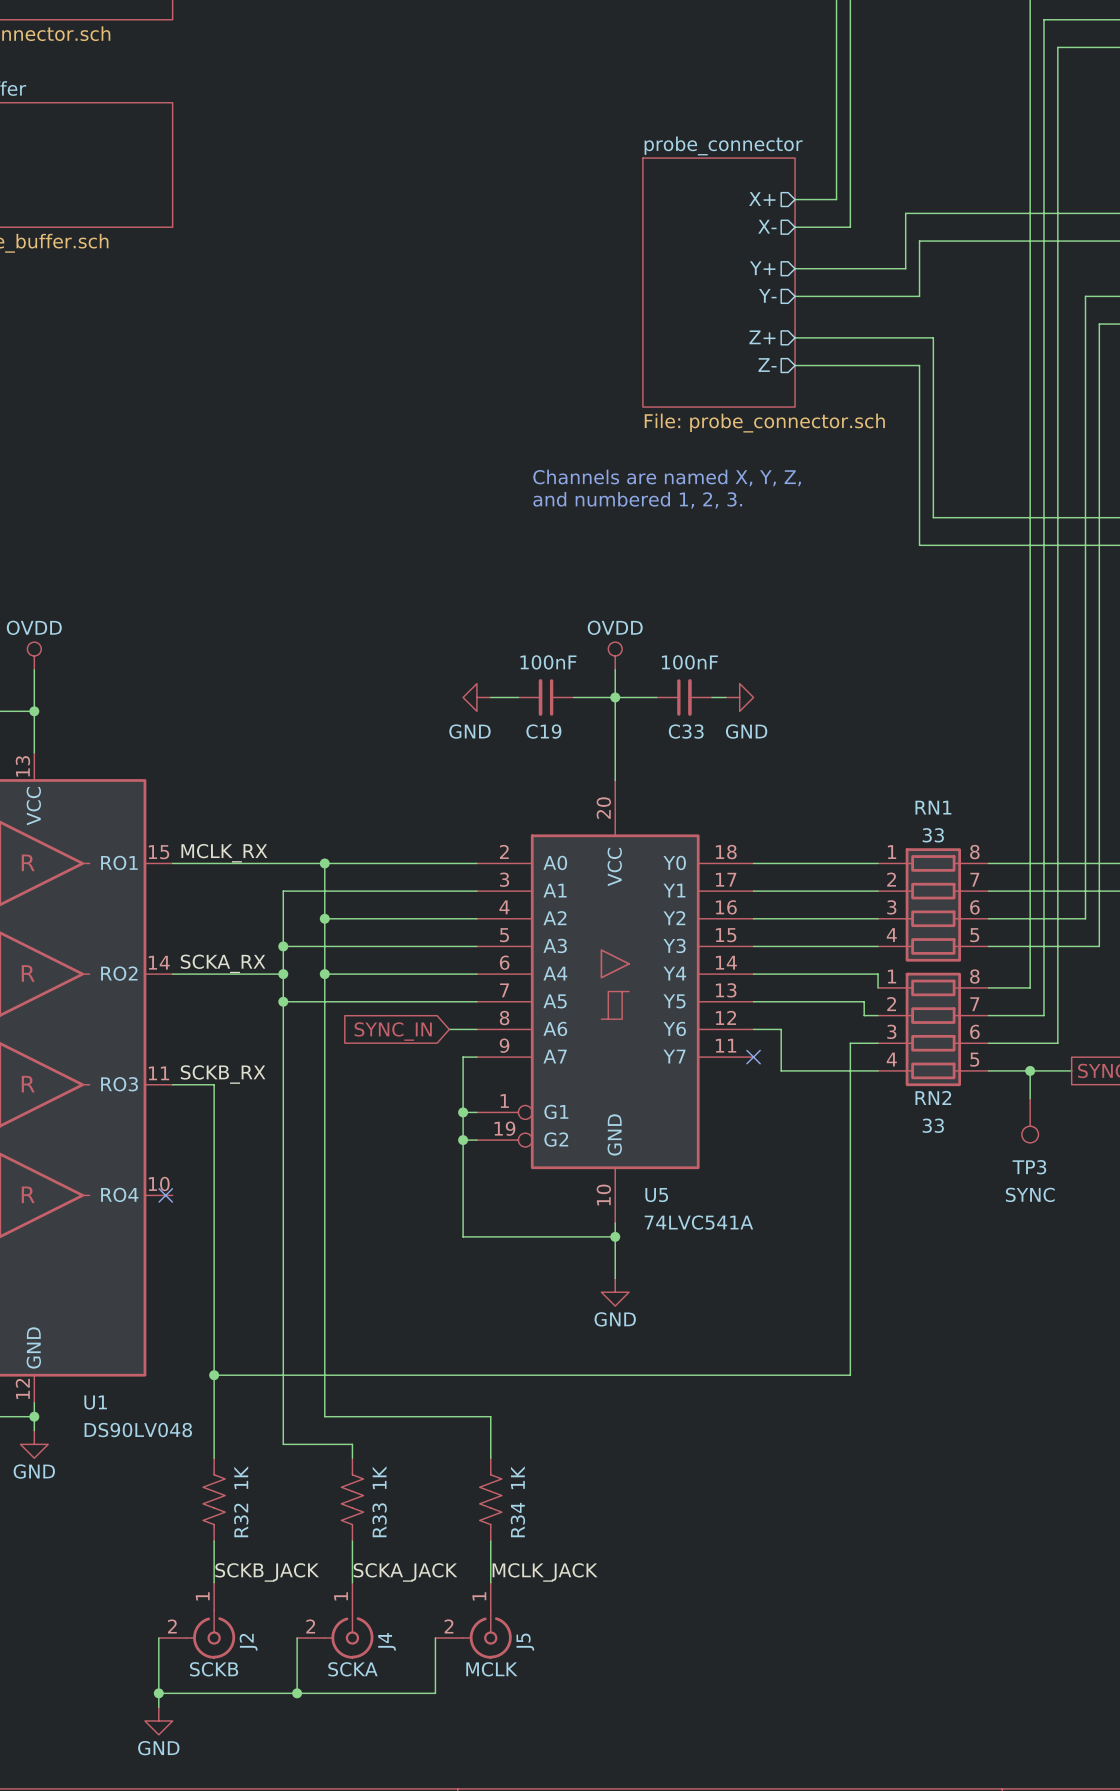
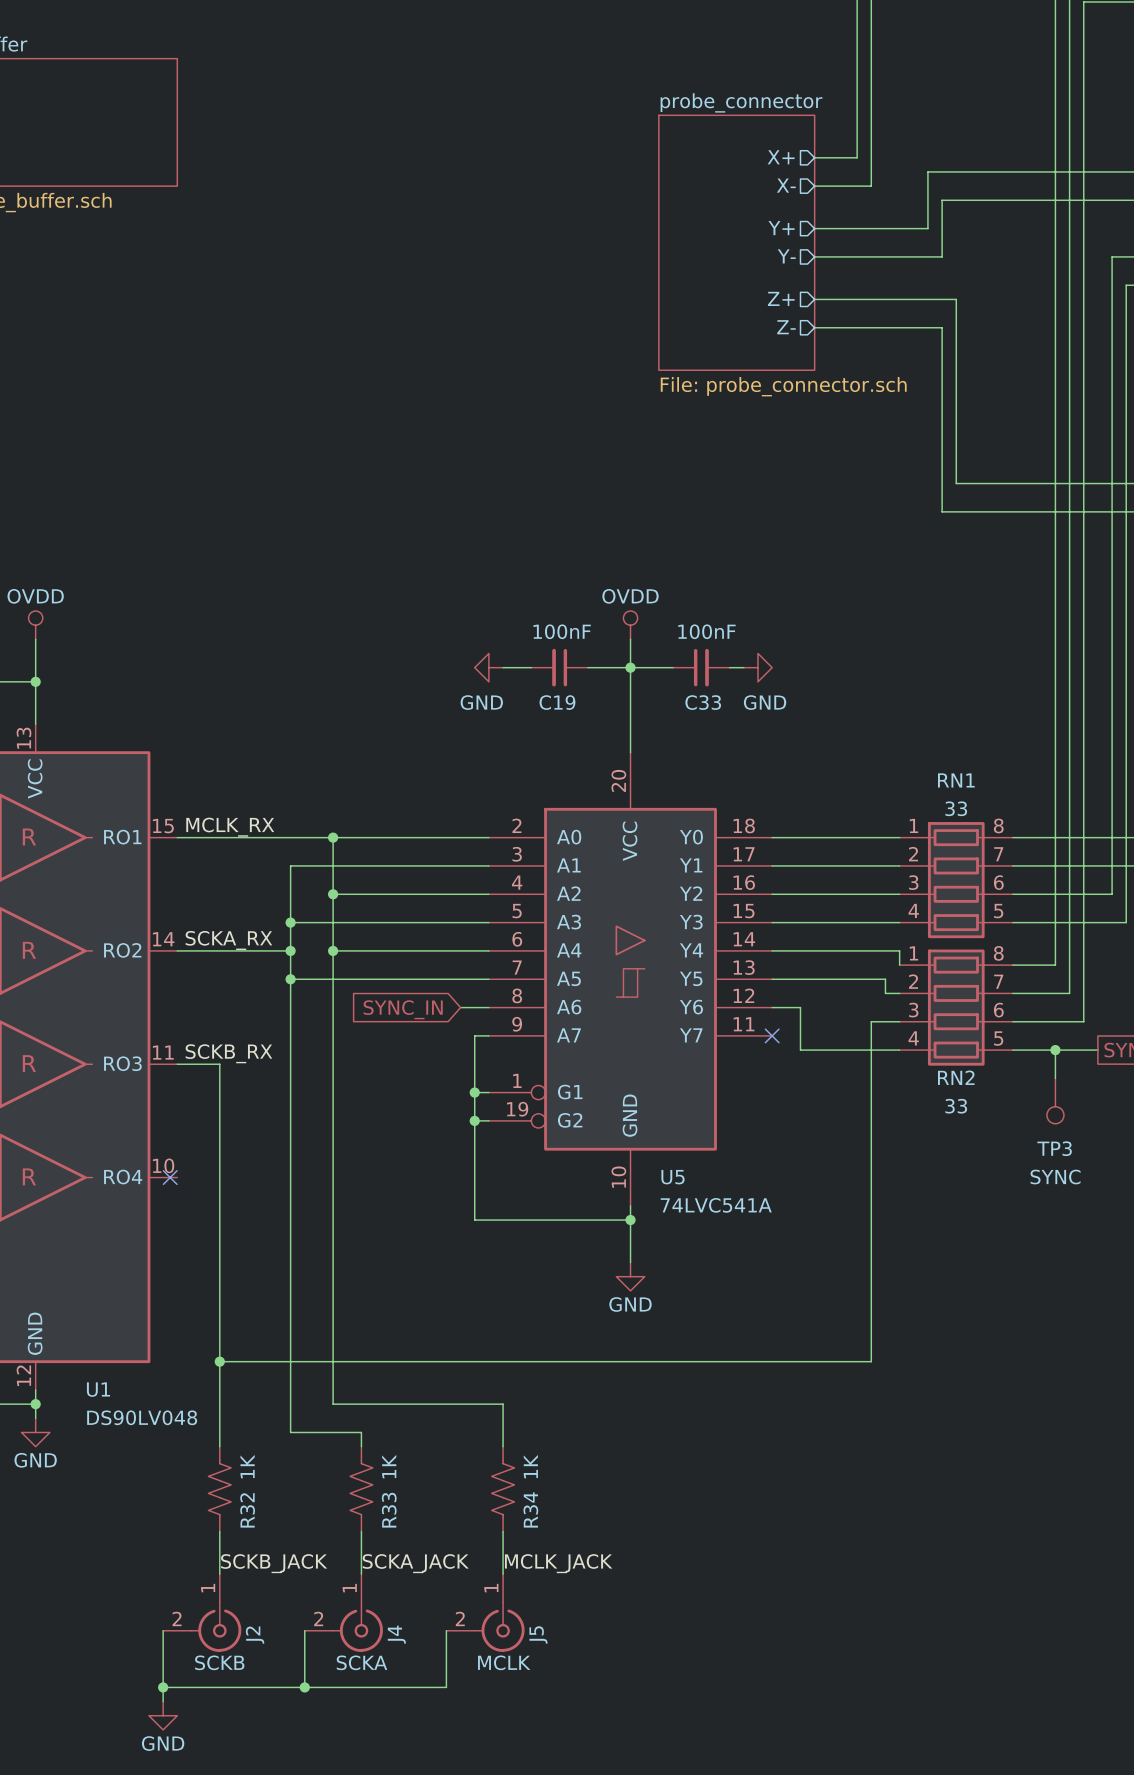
text: Channels are named X, Y, Z, (667, 477) -> none
text: and numbered 1, 2, 3. (637, 500) -> none

